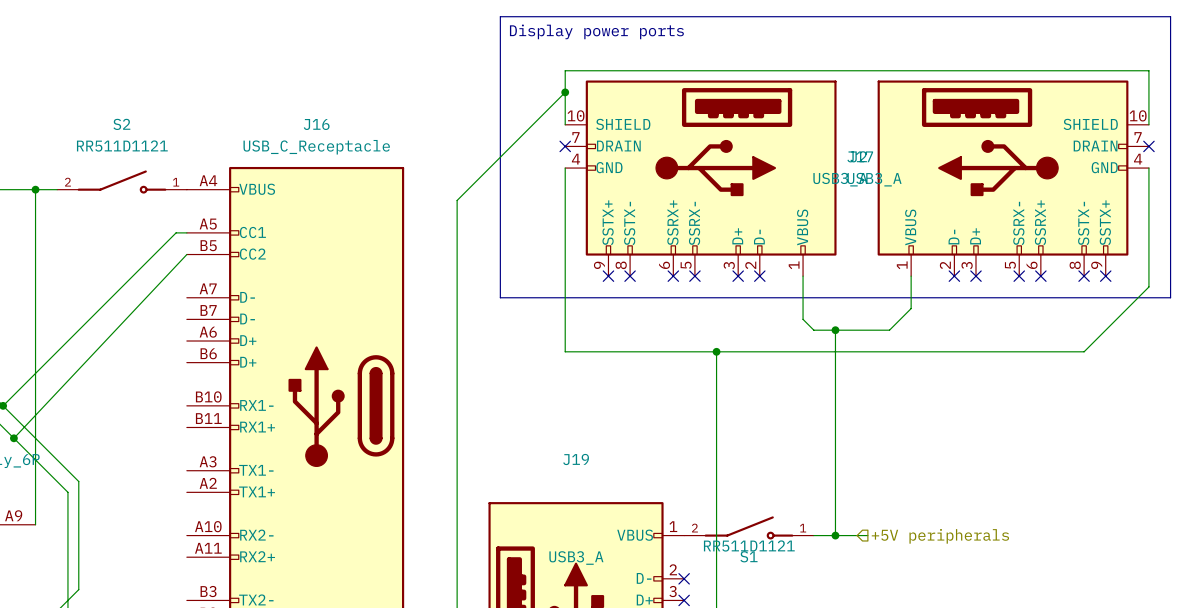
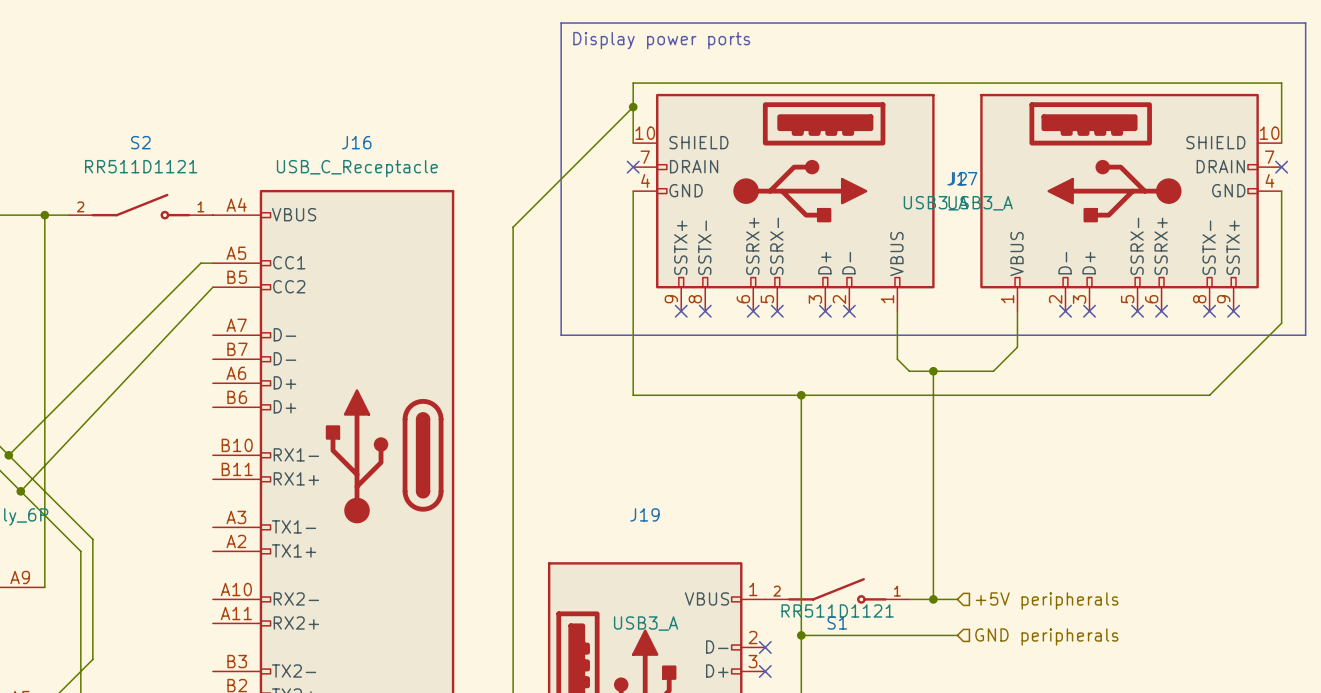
wire: (857, 535) (867, 535) -> none
wire: none -> (801, 635) (957, 635)
junction: none -> (801, 635)
hierarchical label: none -> GND peripherals (1046, 636)

